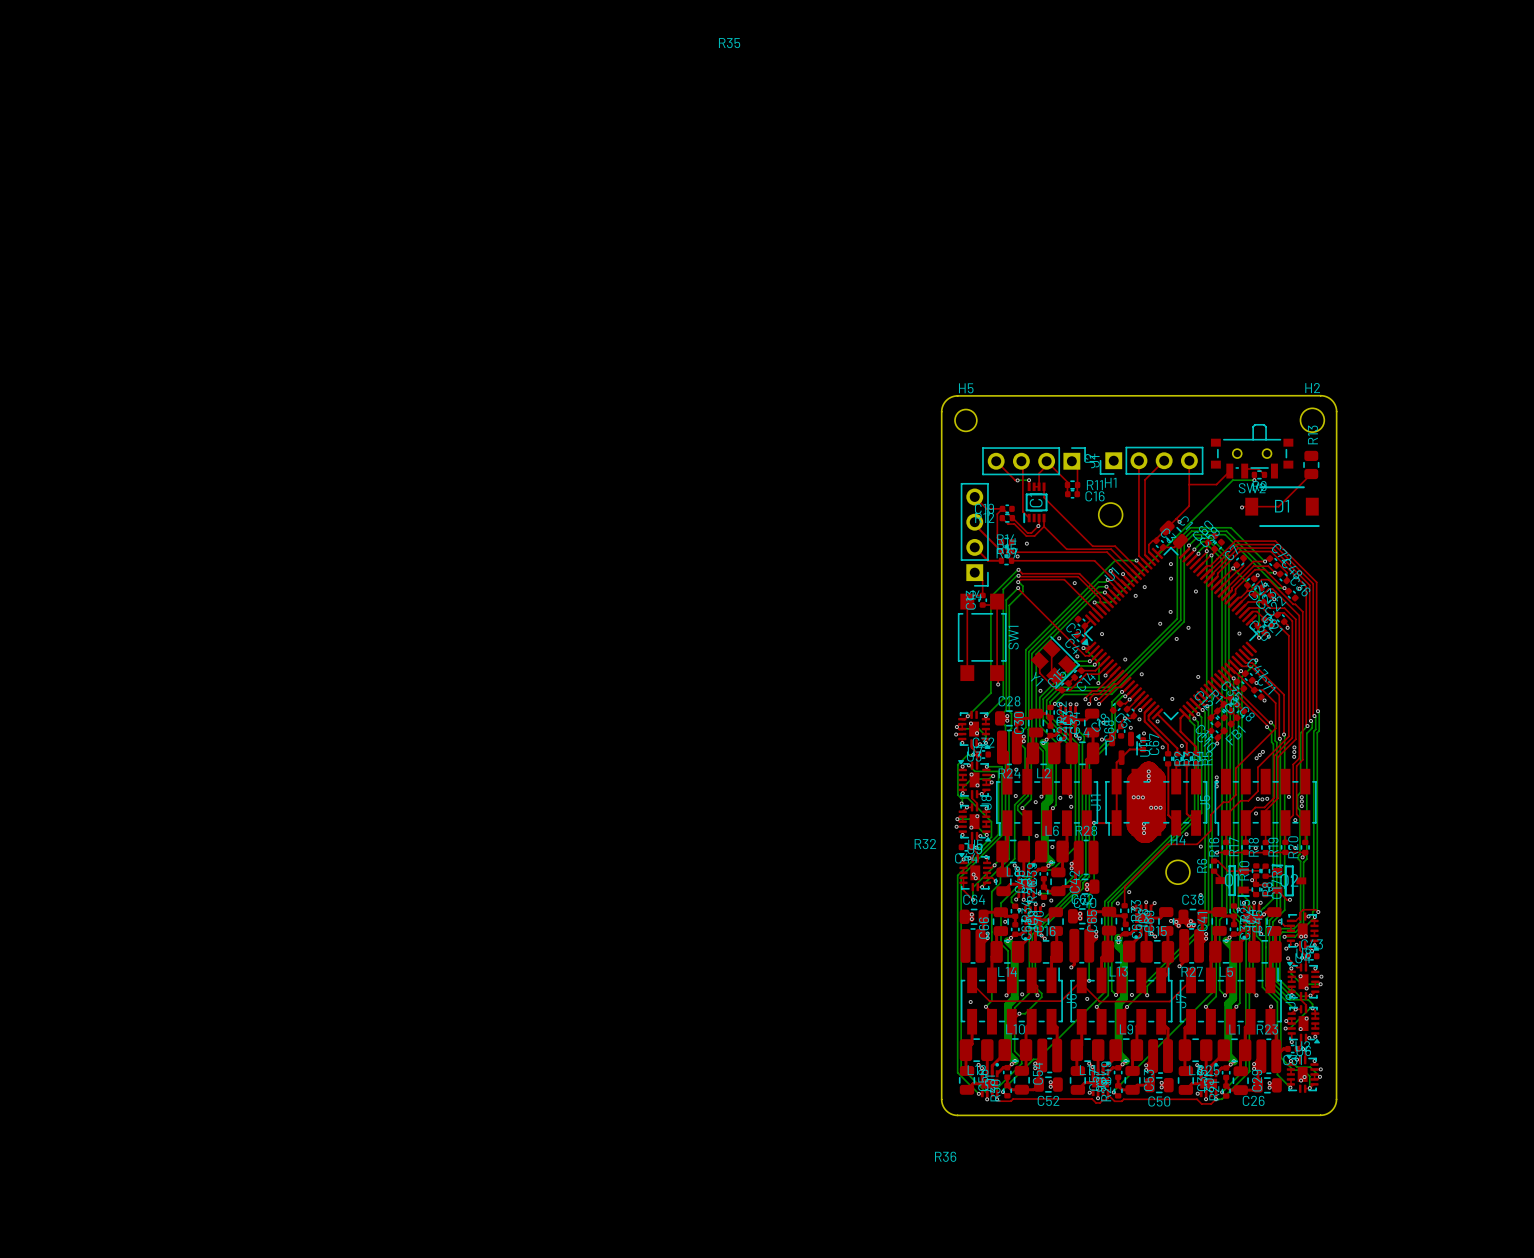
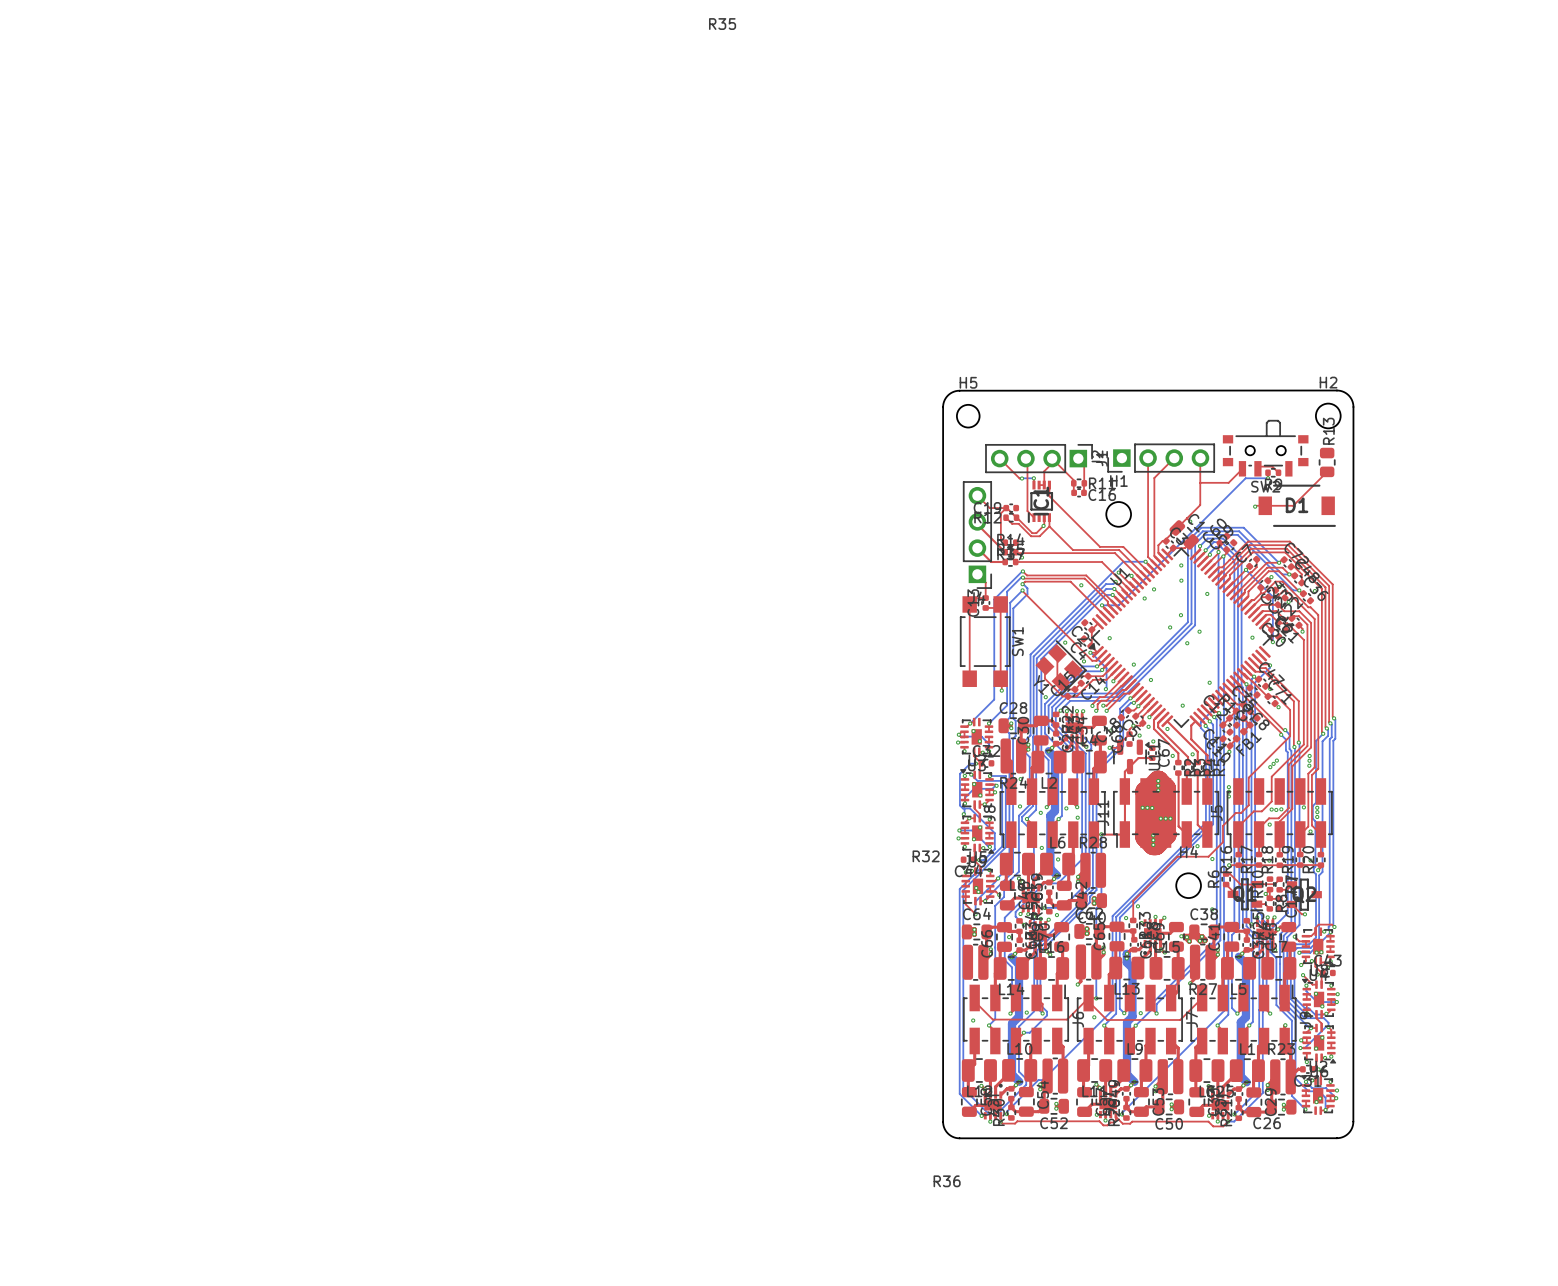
via: (1026, 543) -> none

